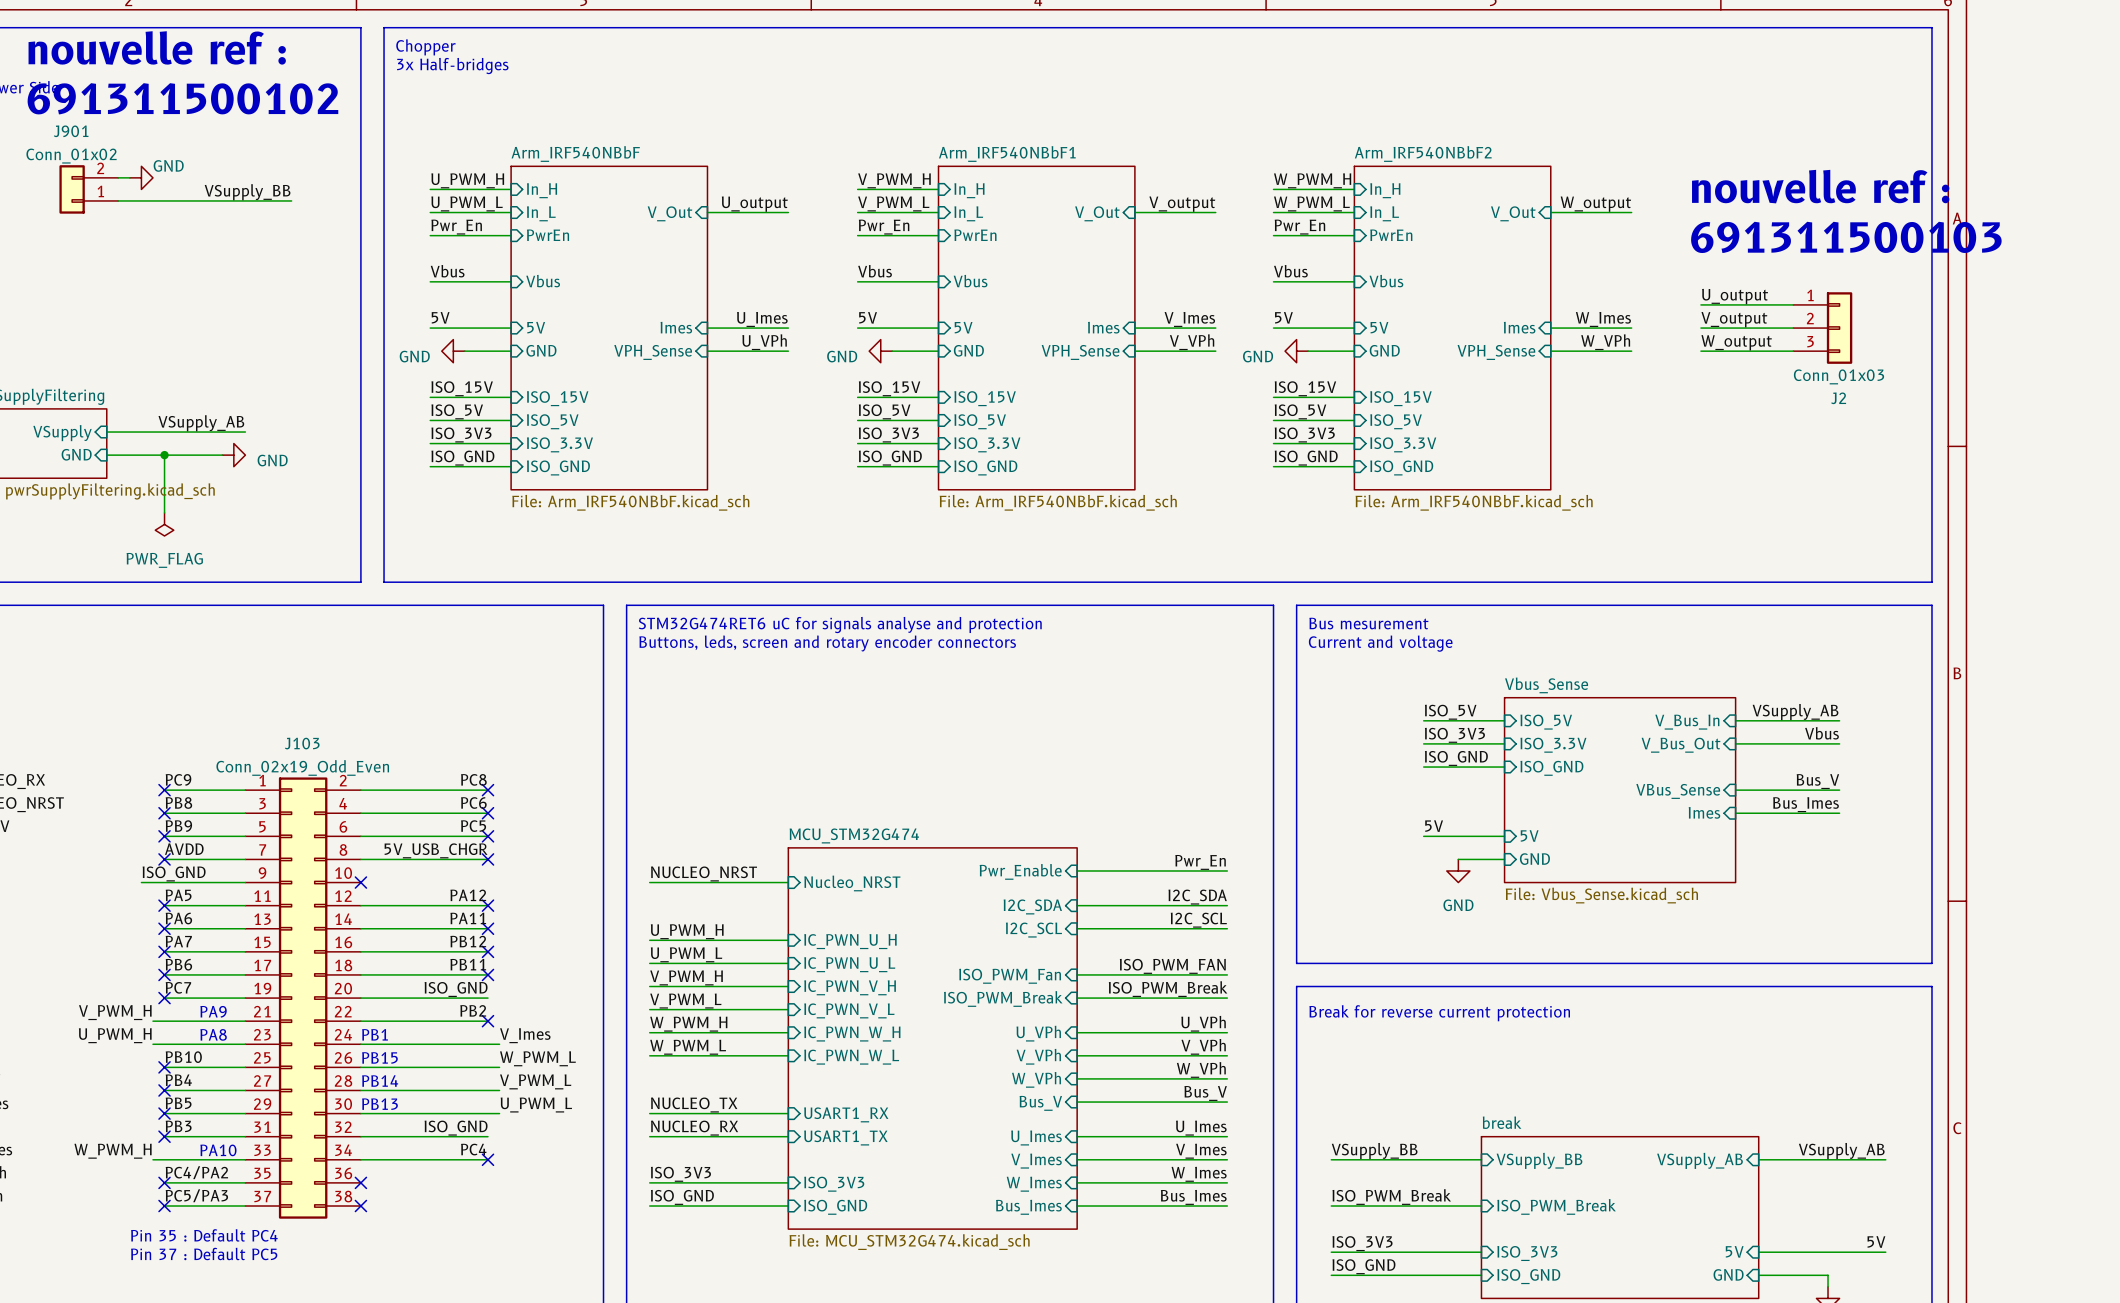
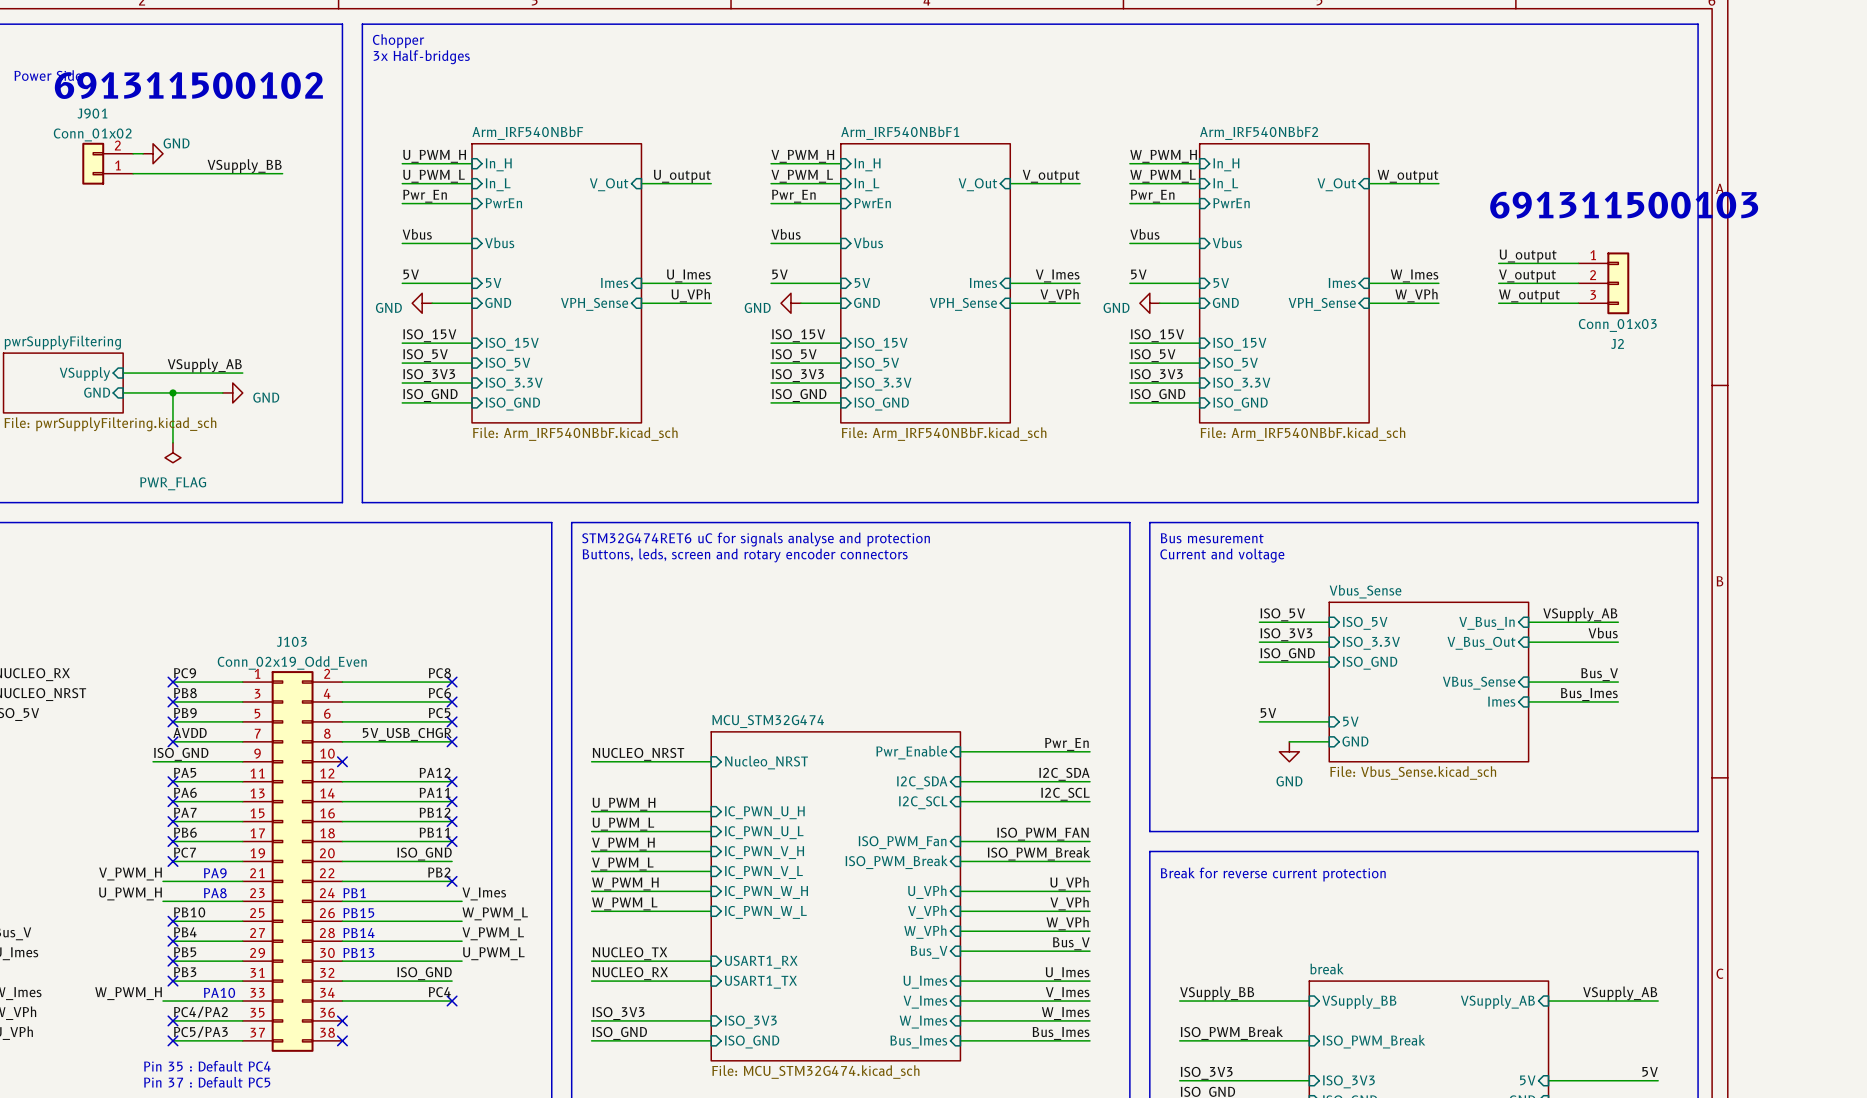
text: nouvelle ref : (157, 47) -> none
text: nouvelle ref : (1820, 186) -> none

